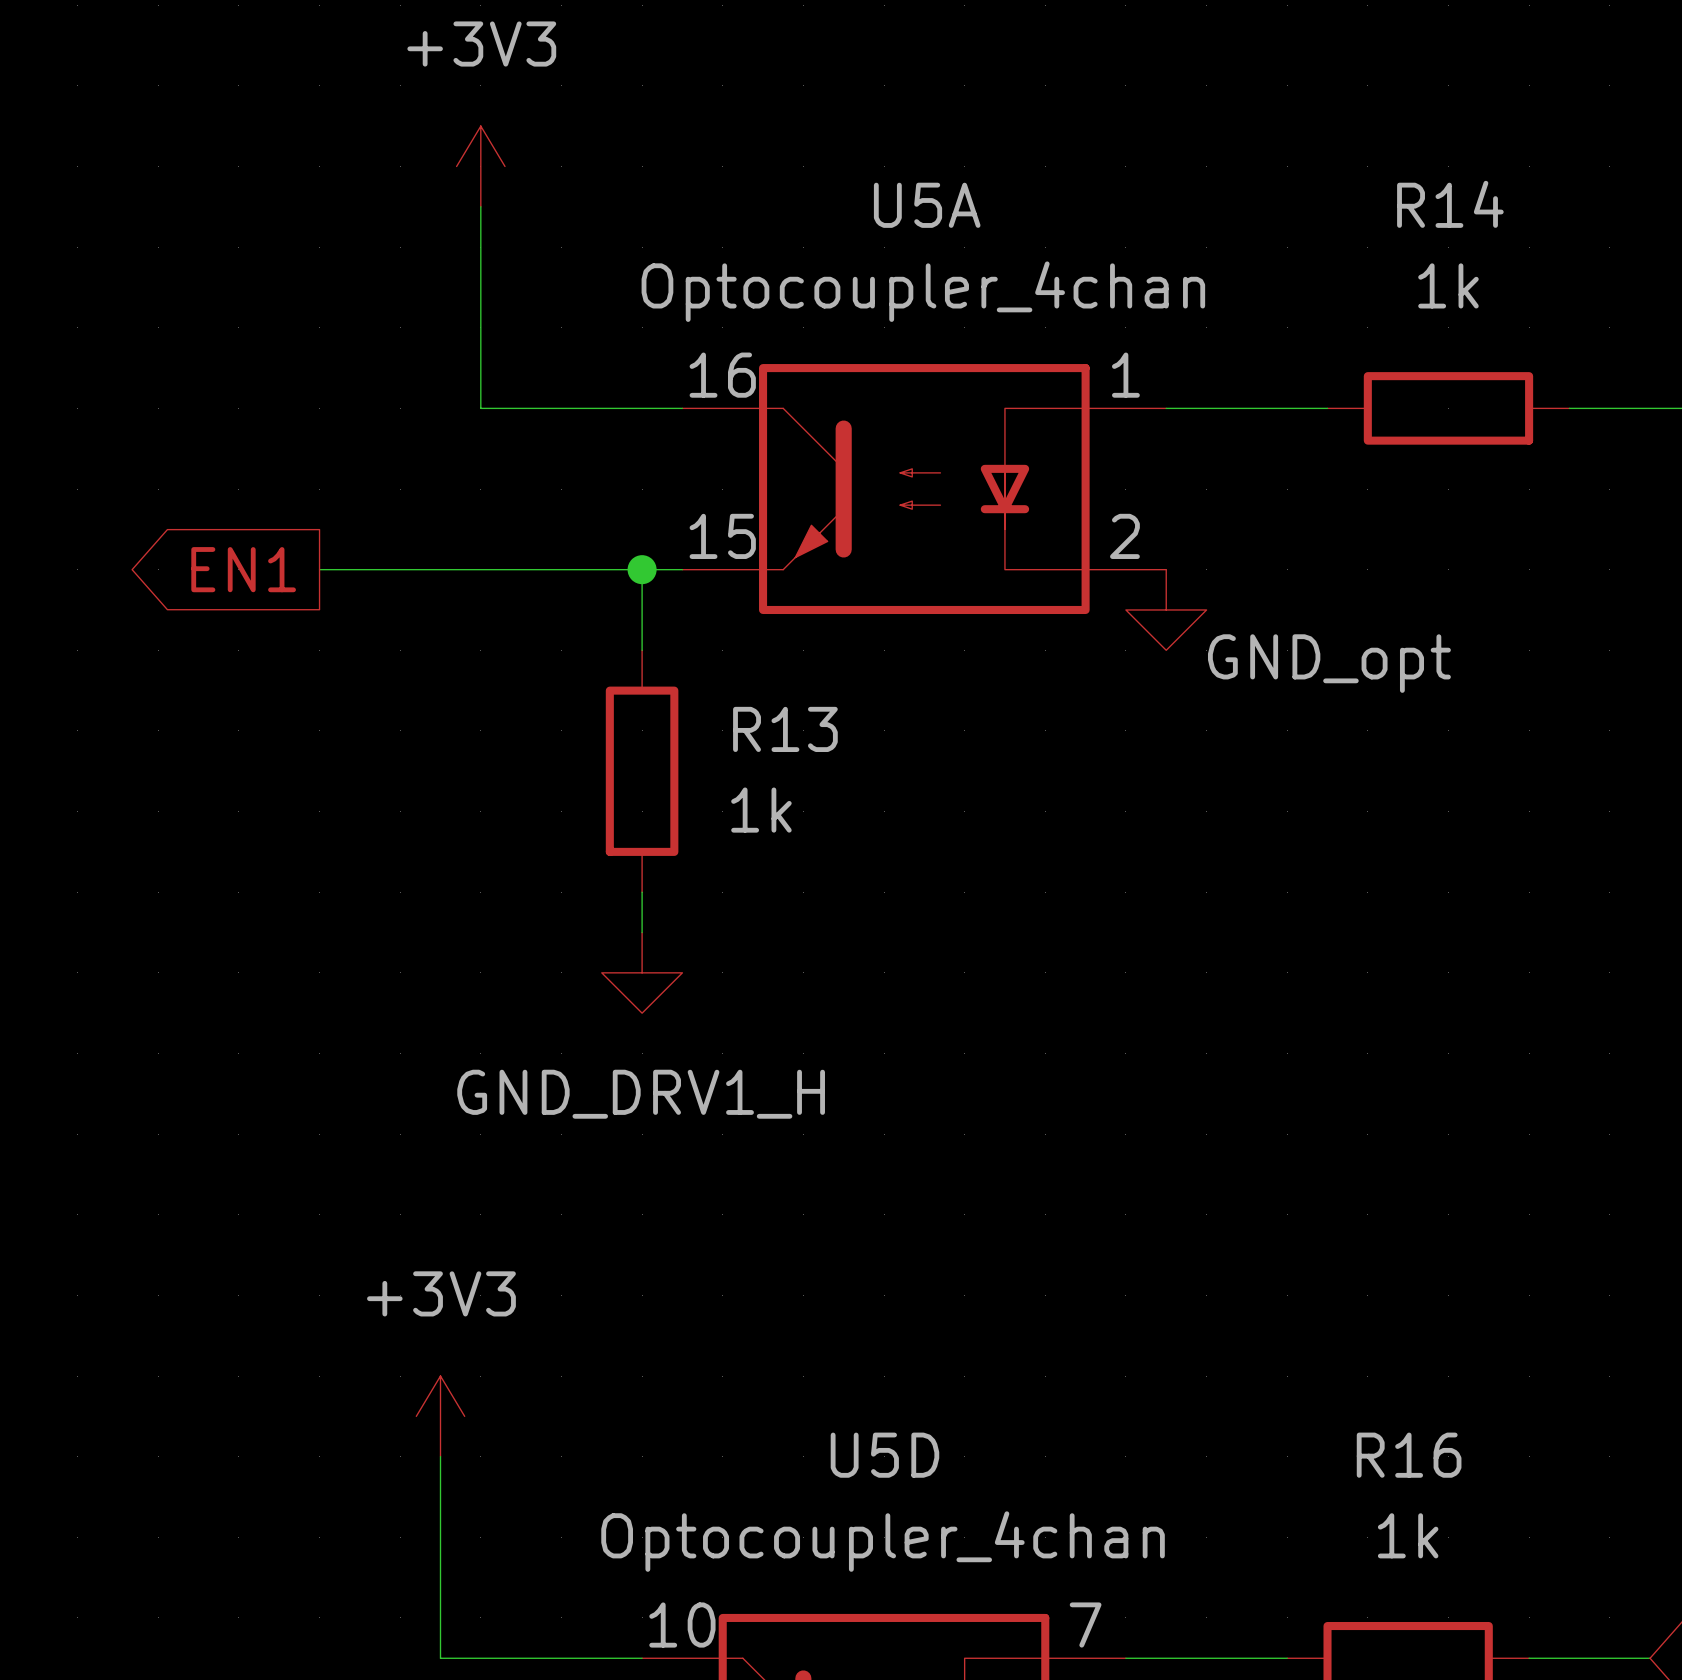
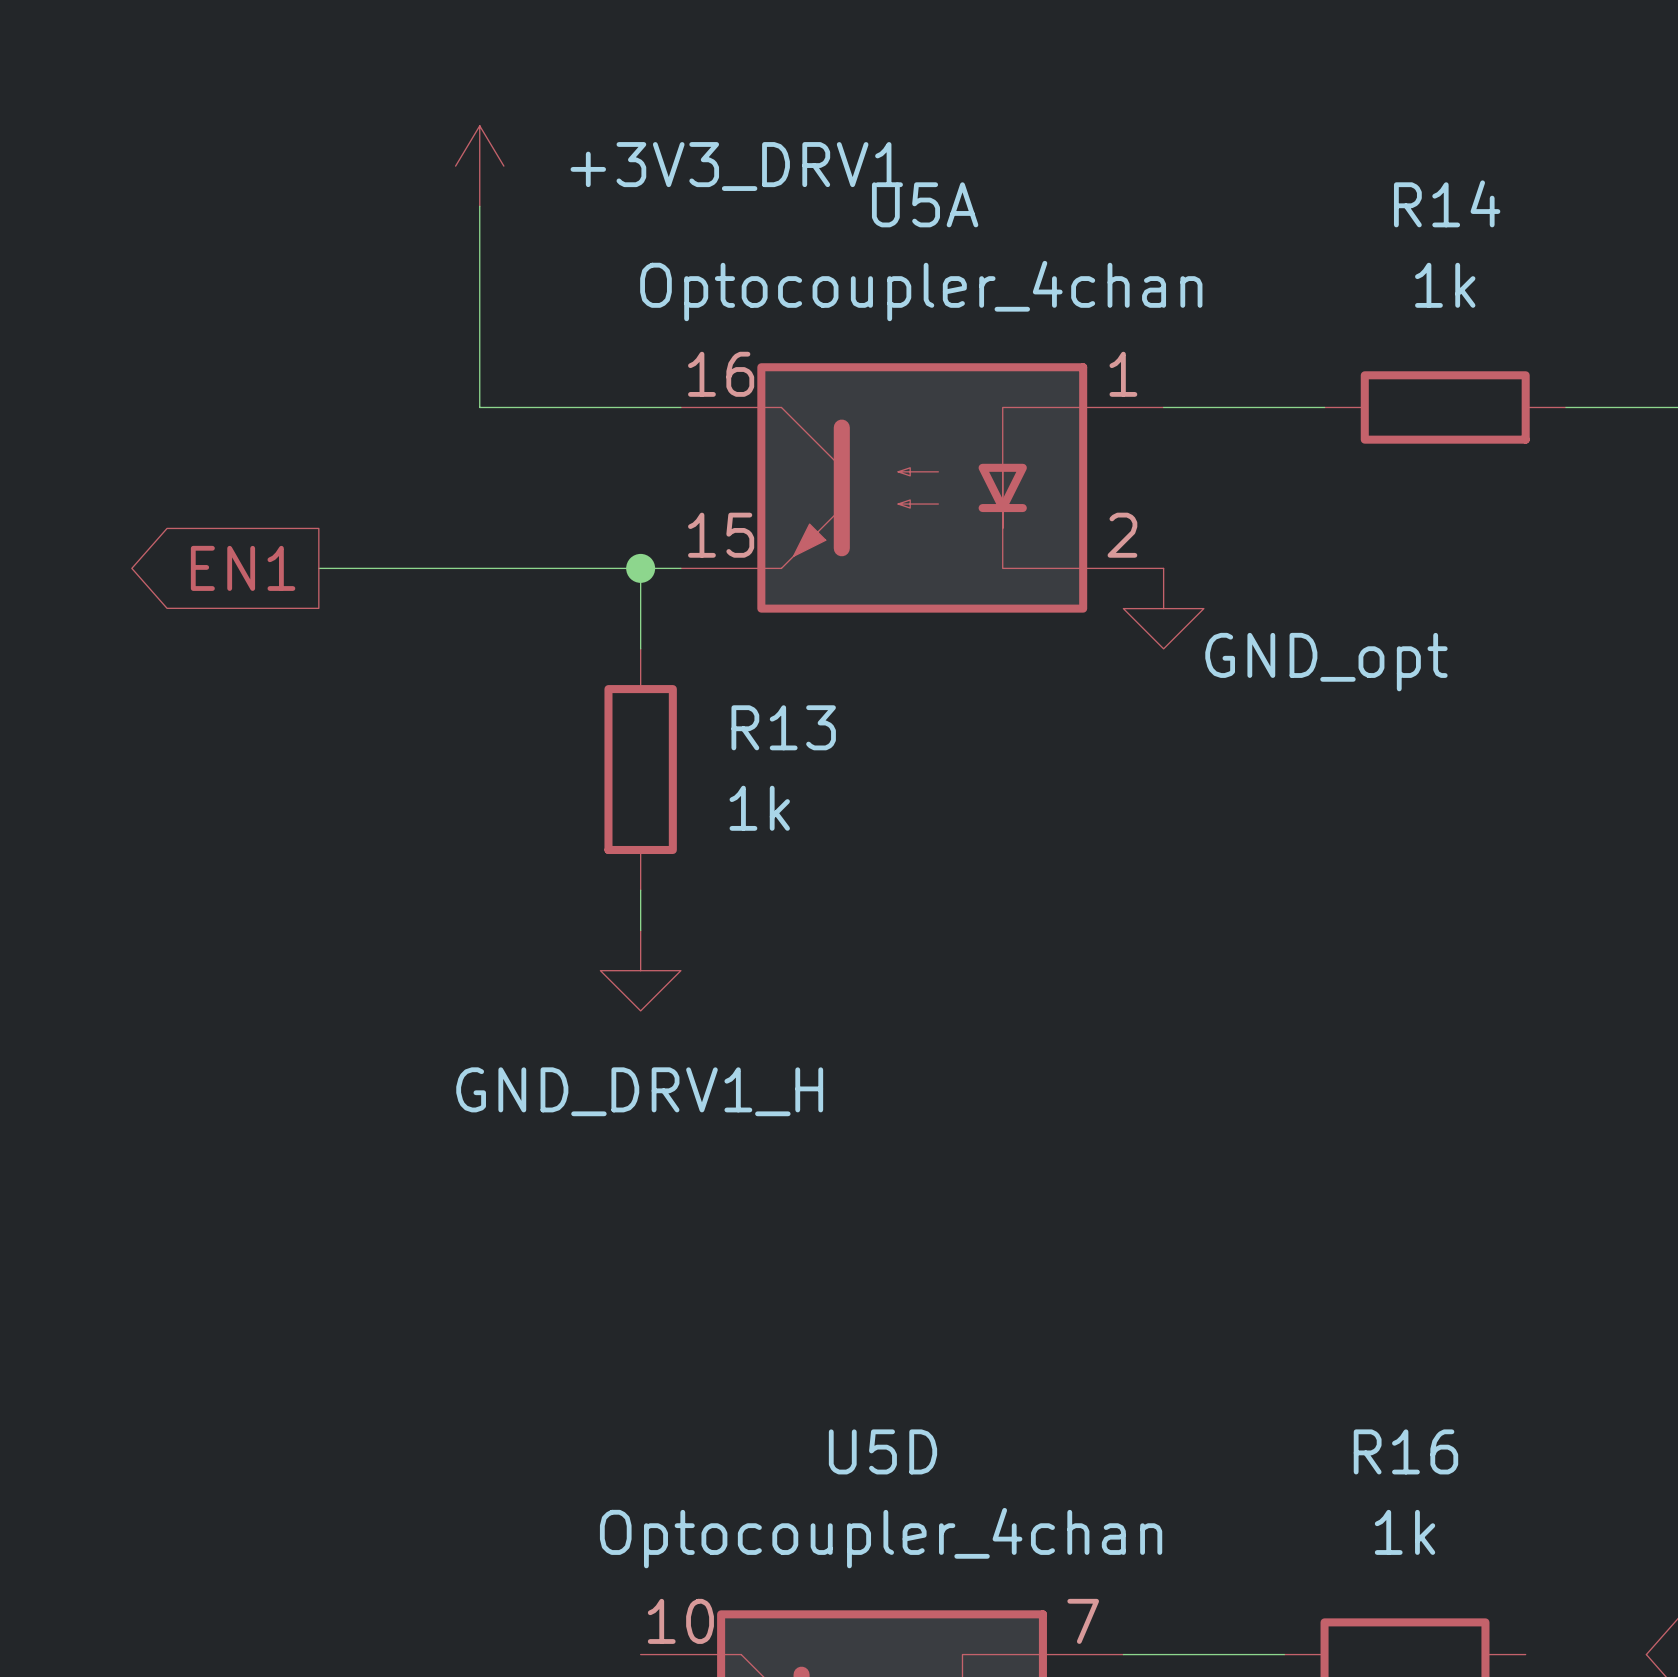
power symbol: +3V3 (480, 166) -> +3V3_DRV1 (479, 166)
power symbol: +3V3 (440, 1416) -> none
wire: (440, 1456) (440, 1658) (642, 1658) -> none
wire: (1529, 1658) (1650, 1658) -> none

